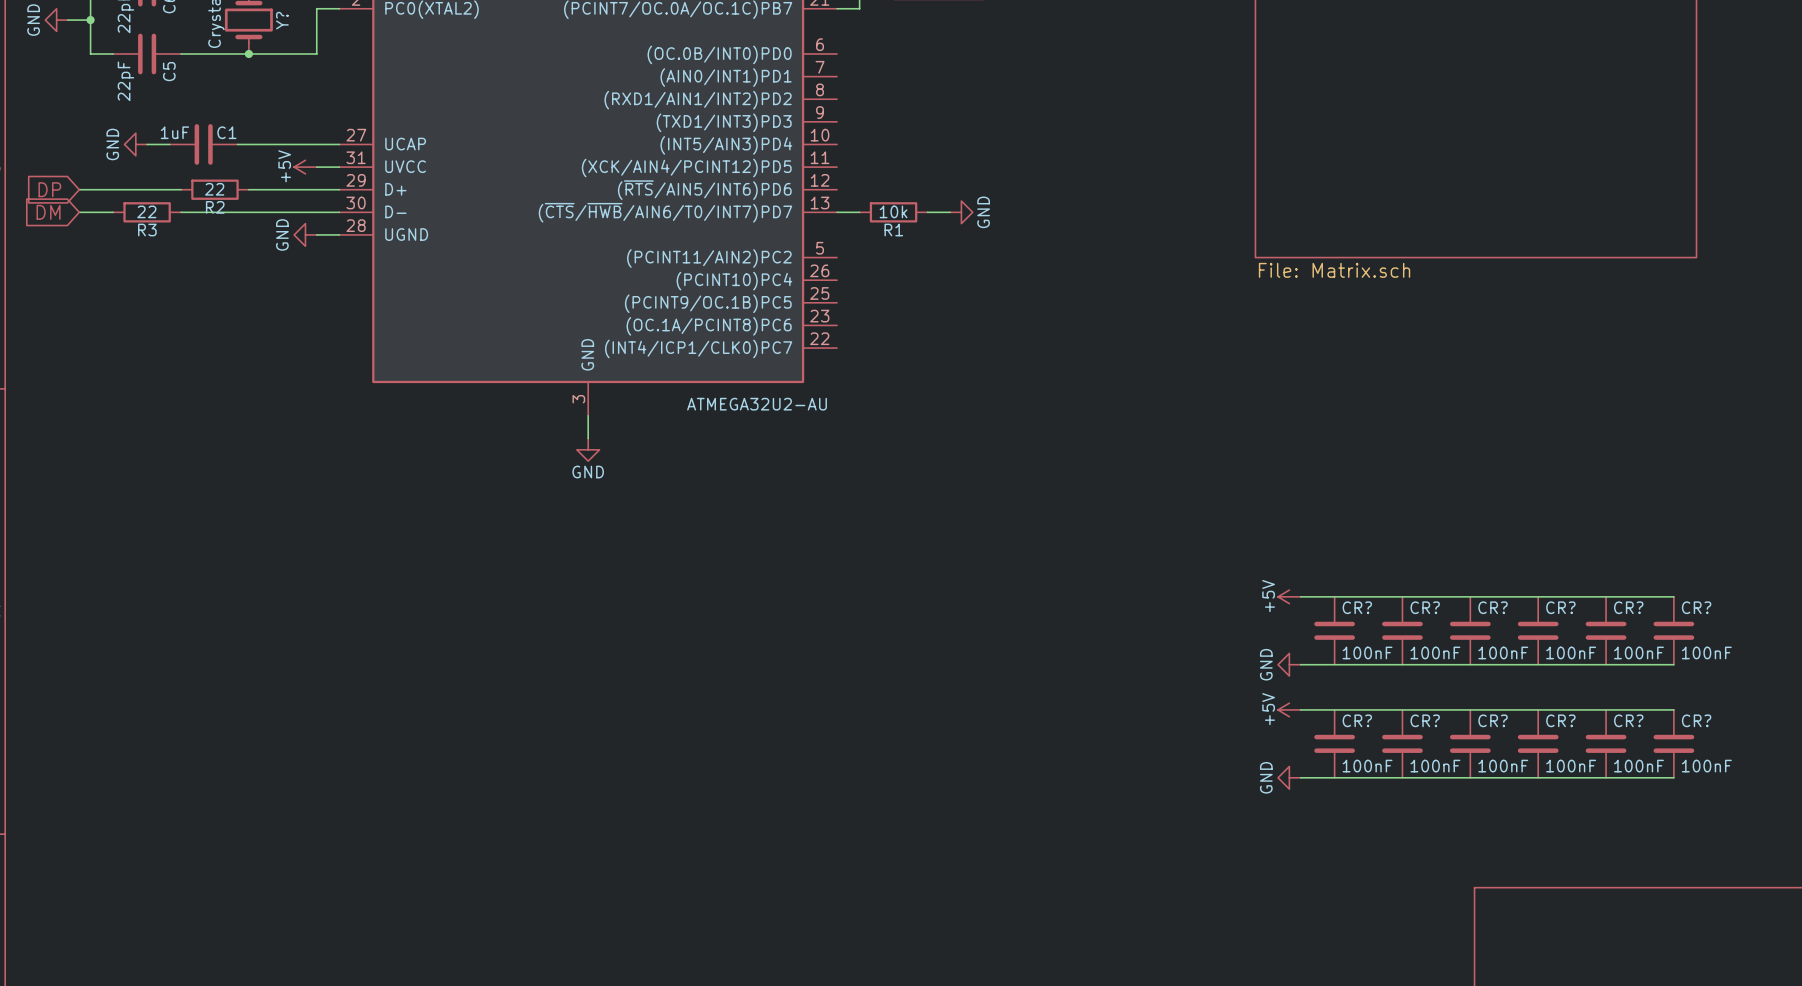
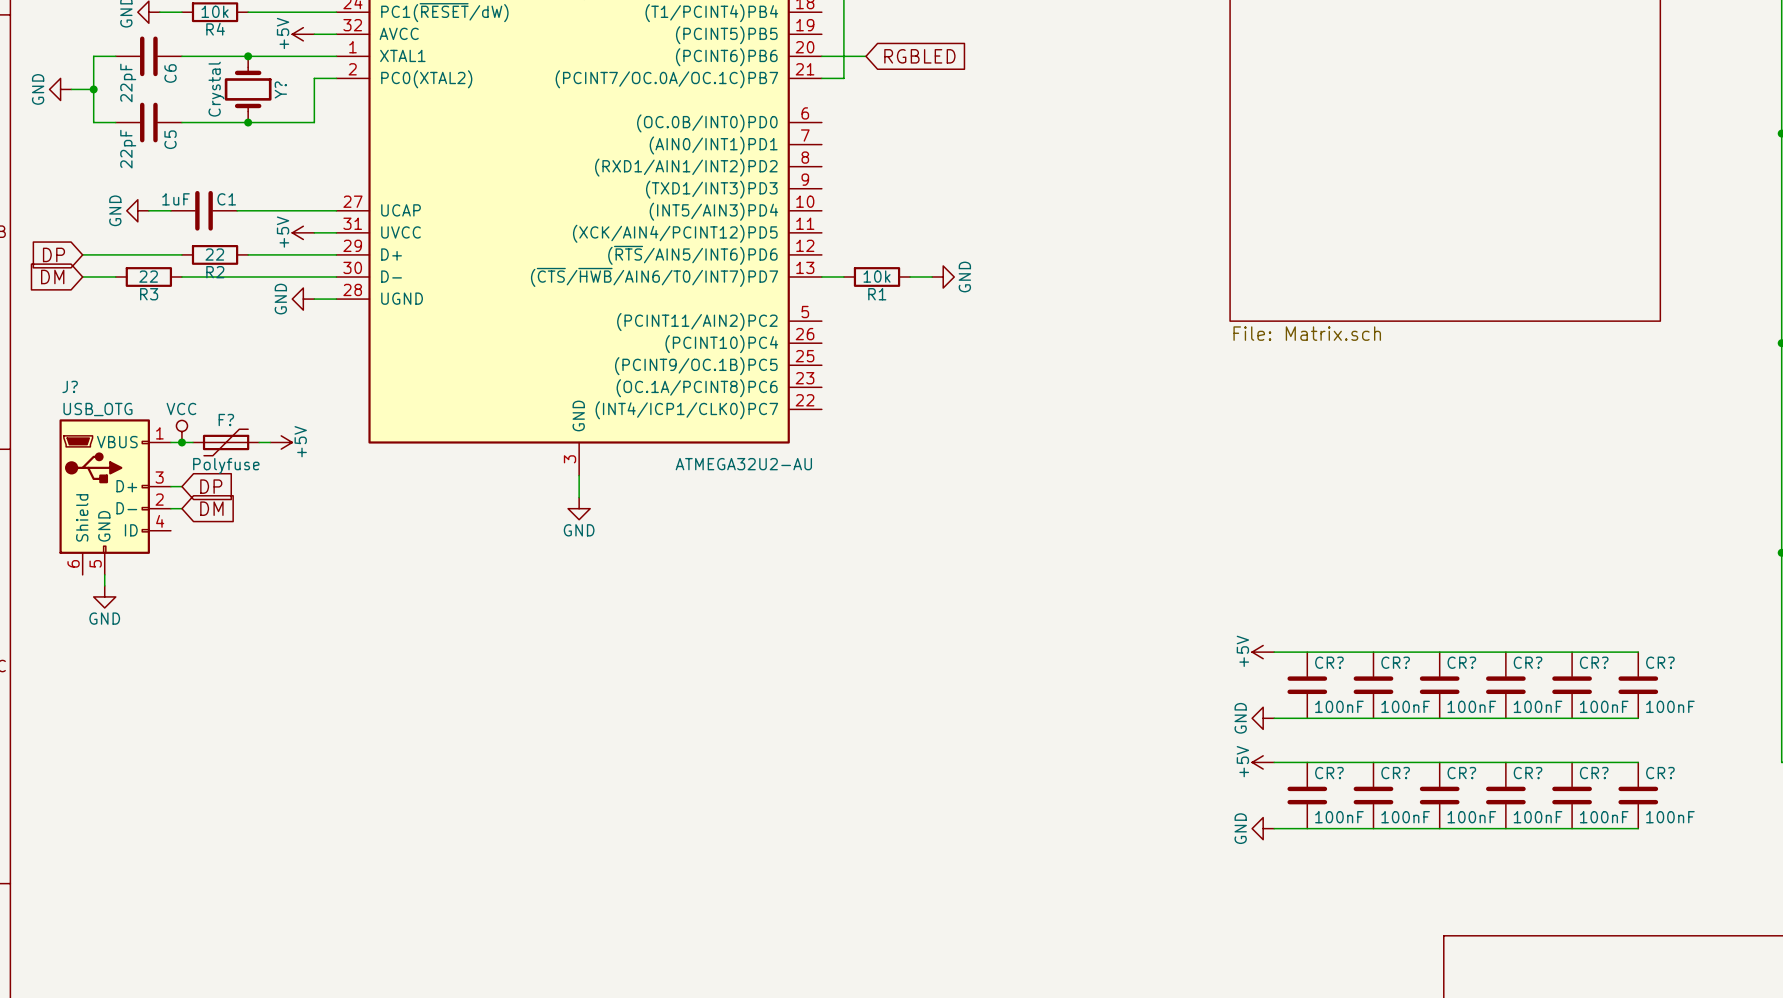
power symbol: none -> VCC (181, 431)
wire: none -> (170, 442) (192, 442)
junction: none -> (181, 442)
F?: none -> Polyfuse (226, 442)
wire: none -> (259, 442) (270, 442)
power symbol: none -> +5V (281, 442)
wire: none -> (170, 486) (181, 486)
global label: none -> DP (211, 486)
J?: none -> USB_OTG (115, 497)
wire: none -> (170, 508) (181, 508)
global label: none -> DM (211, 508)
wire: none -> (104, 574) (104, 585)
power symbol: none -> GND (104, 596)

